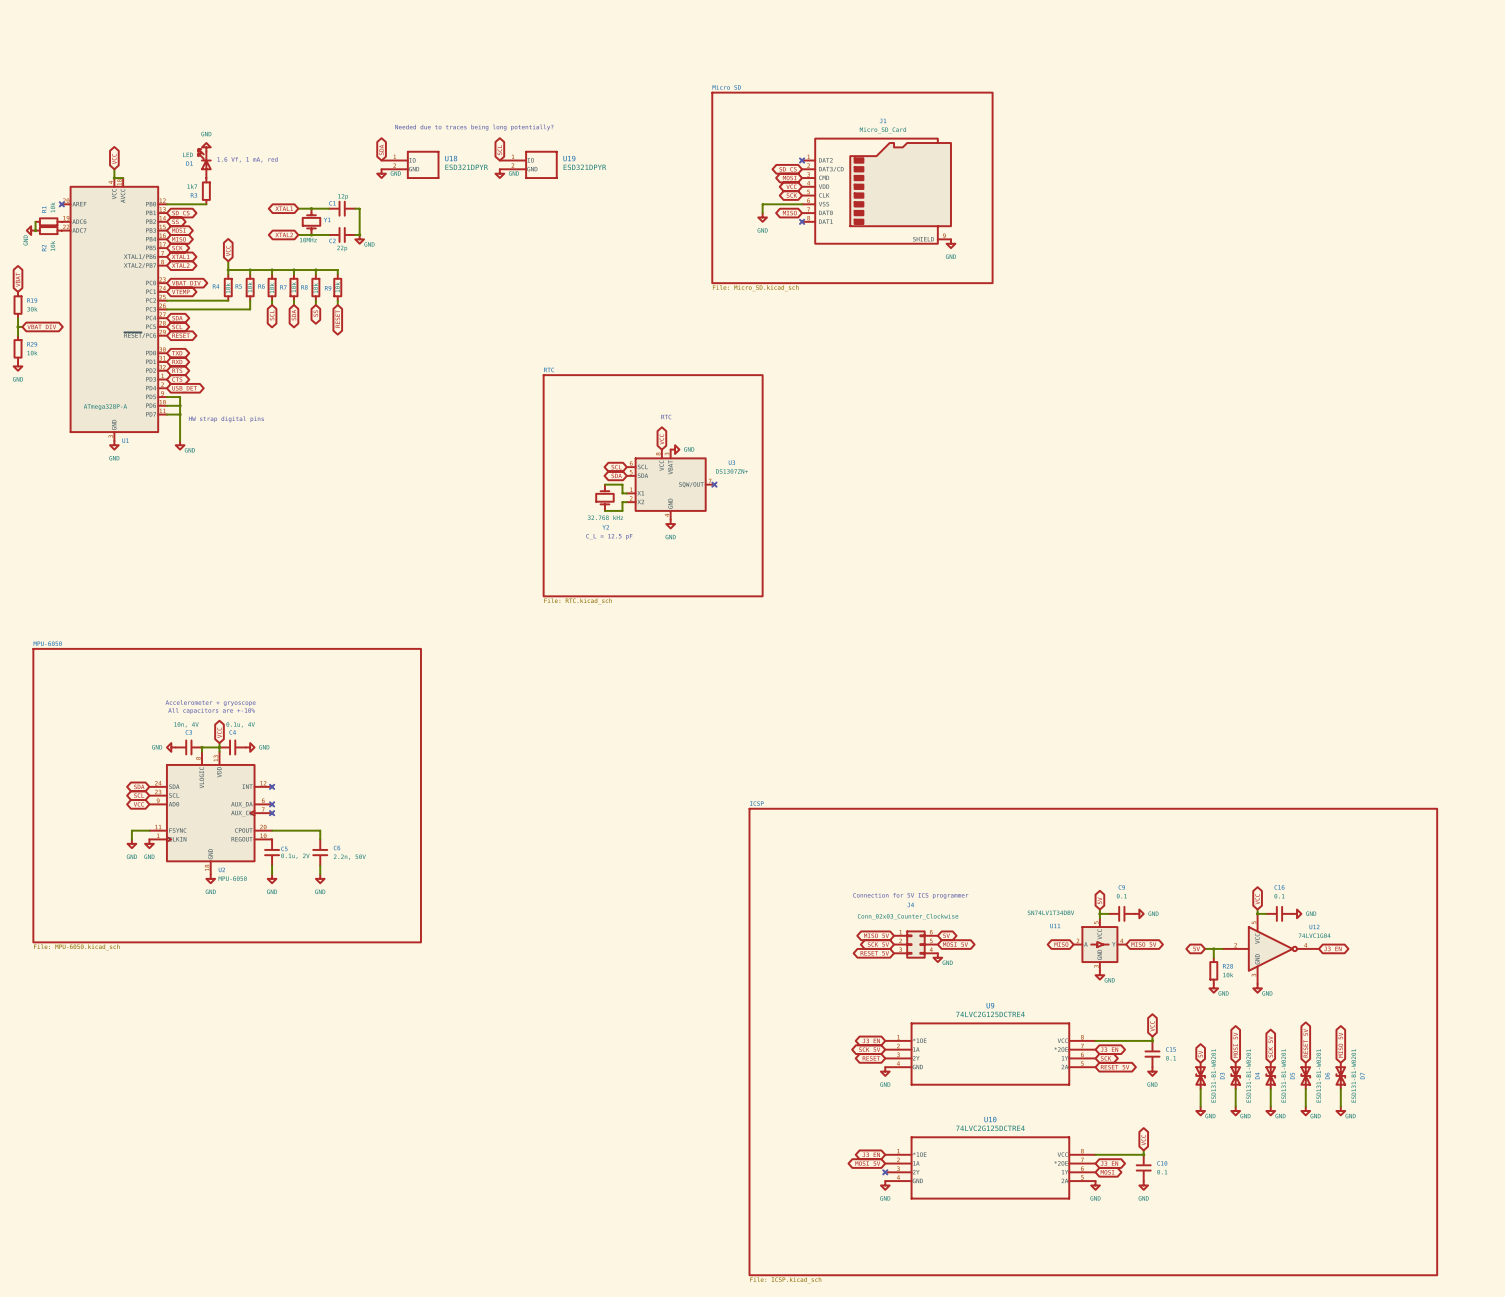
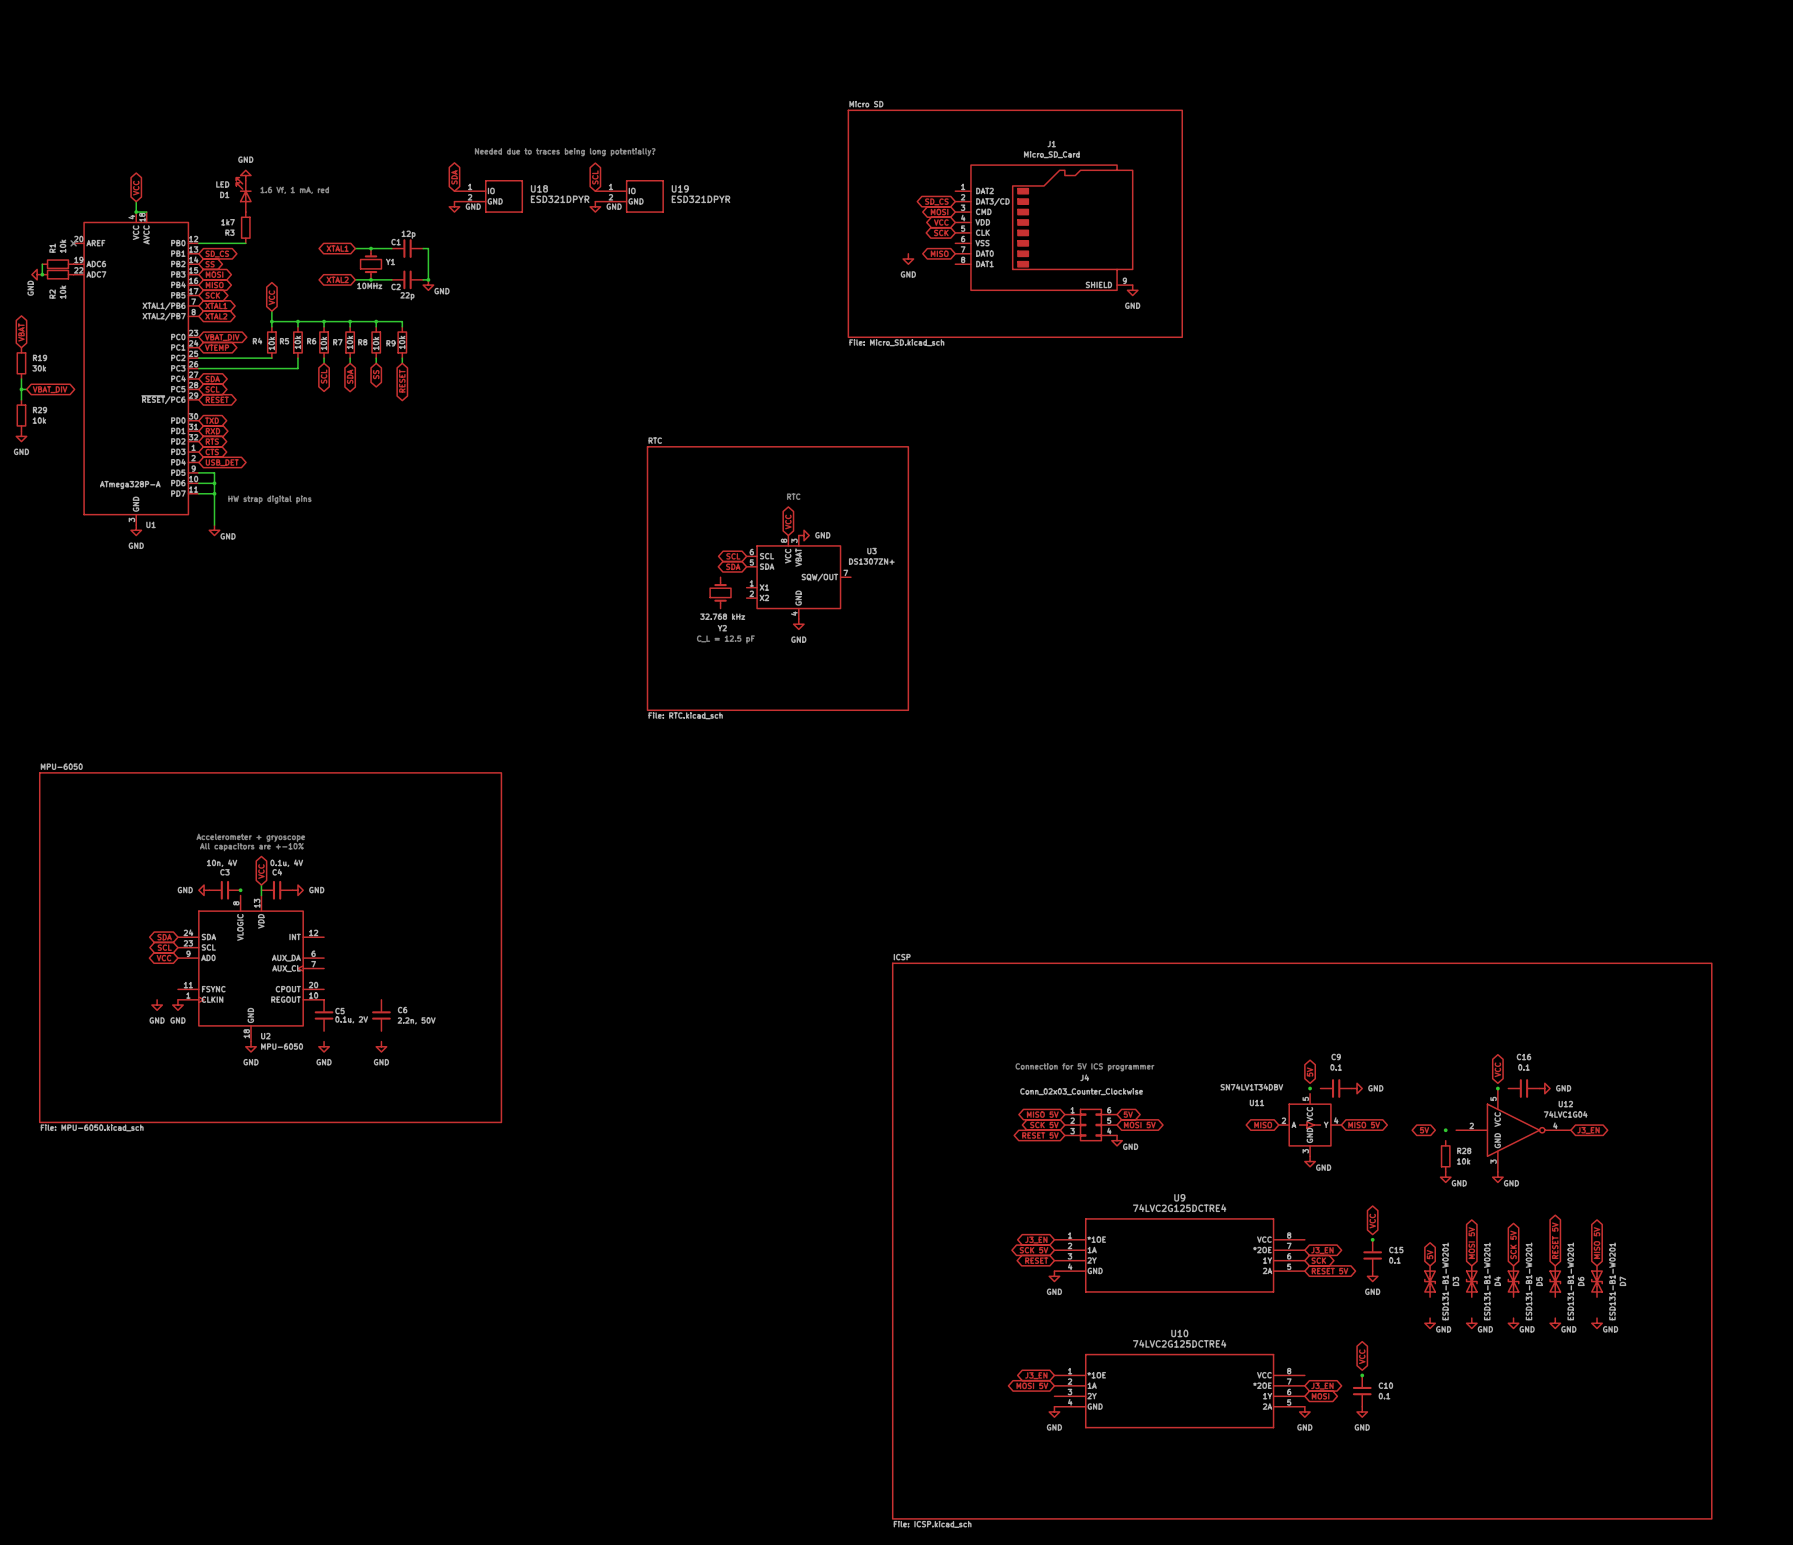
no-connect mark: (802, 160) -> none
wire: (802, 204) (762, 204) (762, 213) -> none
no-connect mark: (802, 221) -> none
wire: (604, 484) (622, 484) (622, 493) (626, 493) -> none
no-connect mark: (714, 484) -> none
wire: (626, 502) (622, 502) (622, 510) (604, 510) -> none
wire: (219, 747) (201, 747) (201, 751) -> none
no-connect mark: (272, 786) -> none
no-connect mark: (272, 804) -> none
no-connect mark: (272, 813) -> none
wire: (149, 830) (131, 830) (131, 839) -> none
wire: (272, 830) (320, 830) (320, 839) -> none
wire: (272, 865) (272, 874) -> none
wire: (320, 865) (320, 874) -> none
wire: (1099, 909) (1099, 918) -> none
wire: (1257, 909) (1257, 913) (1266, 913) -> none
wire: (1099, 913) (1108, 913) -> none
wire: (1205, 948) (1222, 948) -> none
wire: (1213, 948) (1213, 957) -> none
wire: (1152, 1036) (1152, 1040) (1095, 1040) -> none
wire: (1200, 1089) (1200, 1106) -> none
wire: (1235, 1089) (1235, 1106) -> none
wire: (1270, 1089) (1270, 1106) -> none
wire: (1305, 1089) (1305, 1106) -> none
wire: (1340, 1089) (1340, 1106) -> none
wire: (1143, 1150) (1143, 1154) (1095, 1154) -> none
no-connect mark: (885, 1172) -> none

